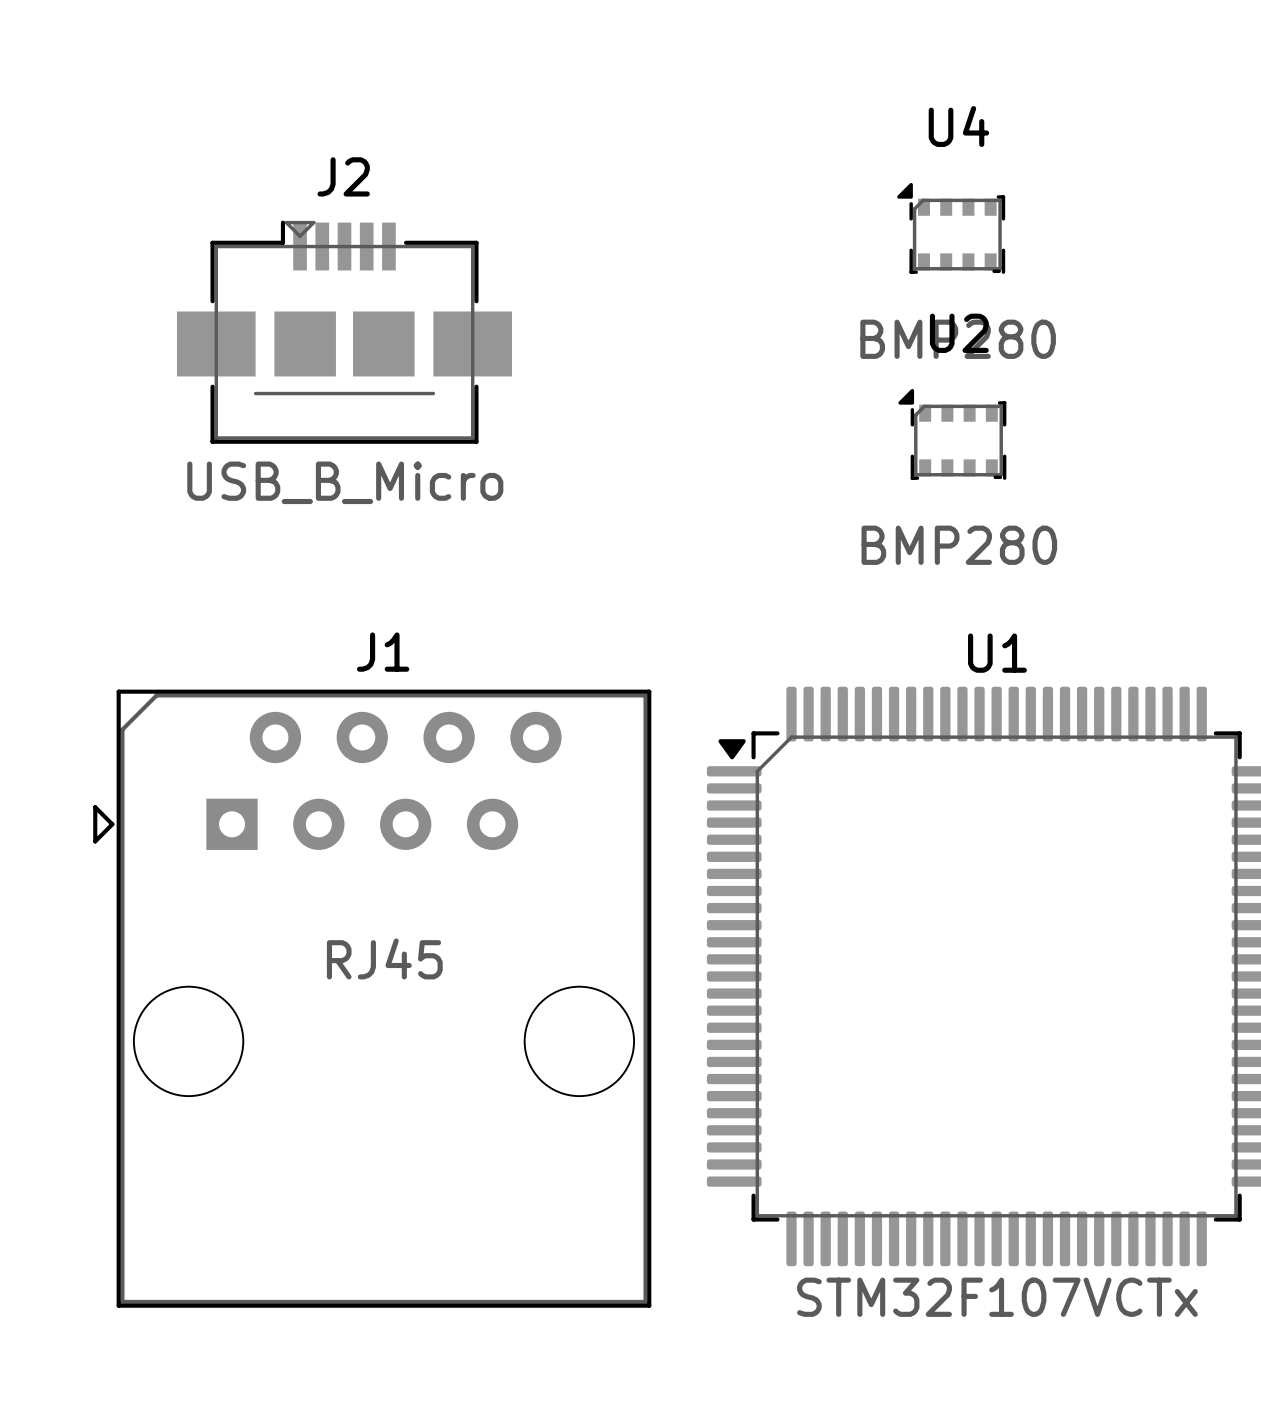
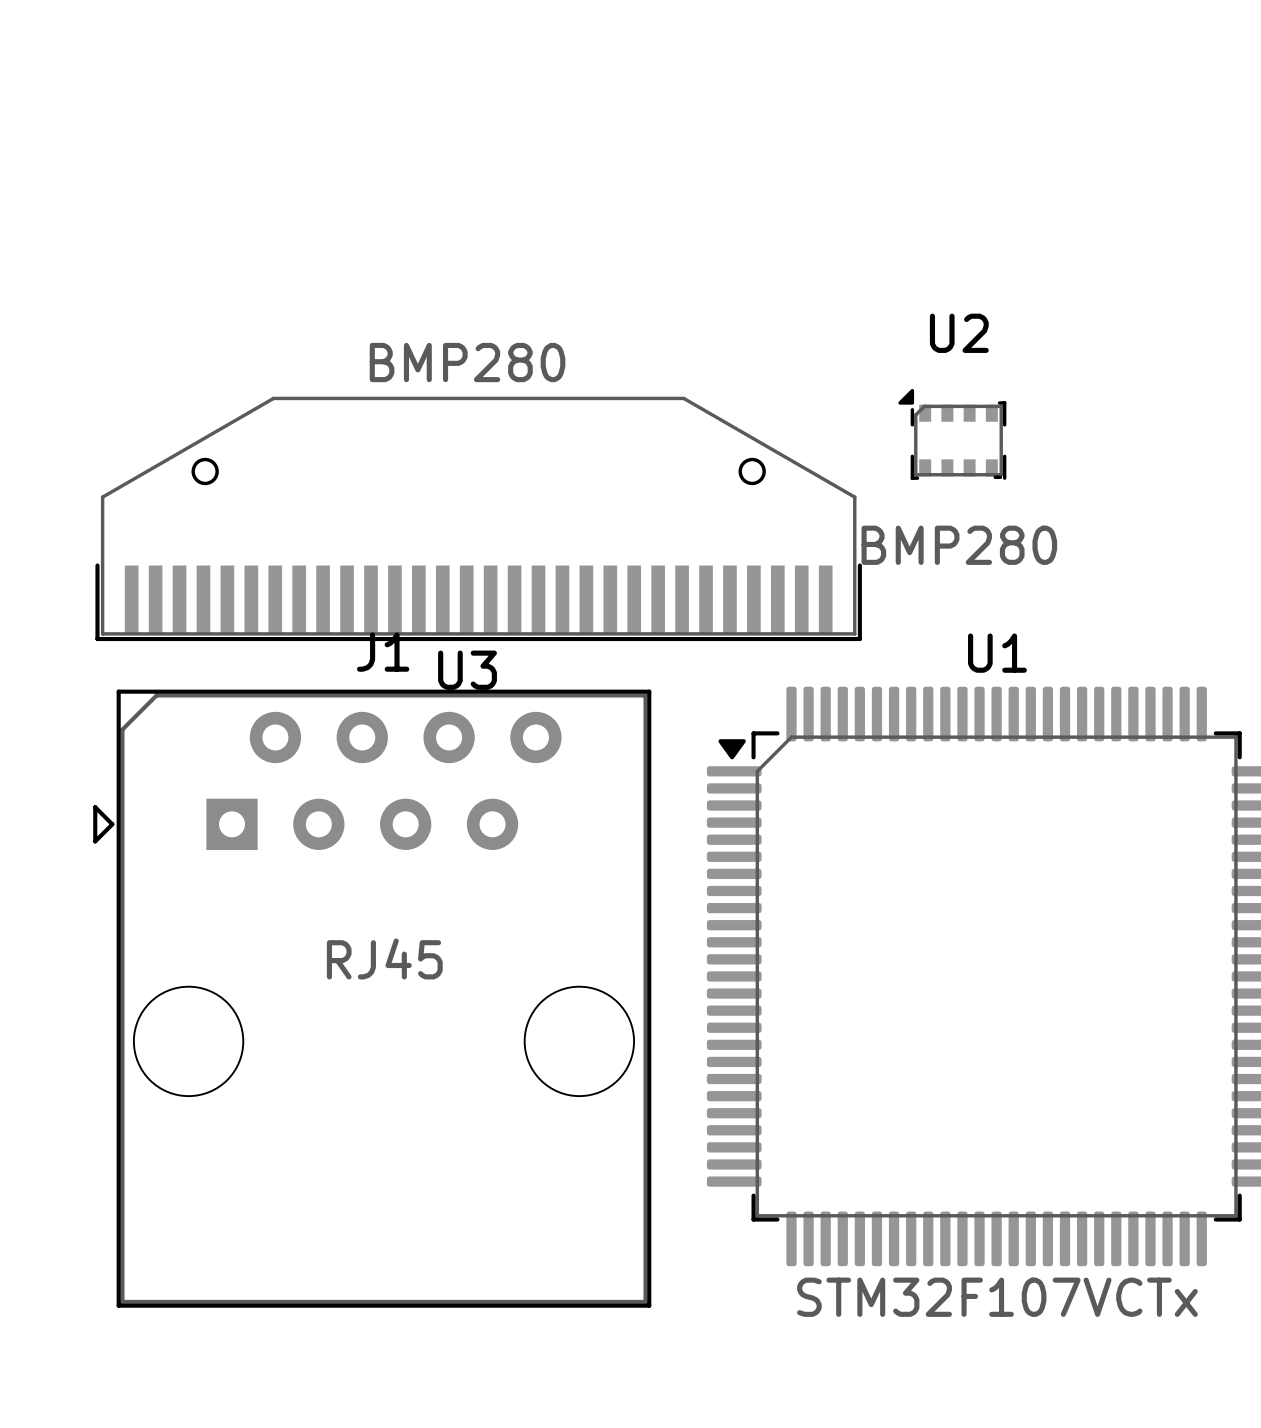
U4: BMP280 (951, 228) -> none
J2: USB_B_Micro (344, 332) -> none
U3: none -> BMP280 (478, 518)

